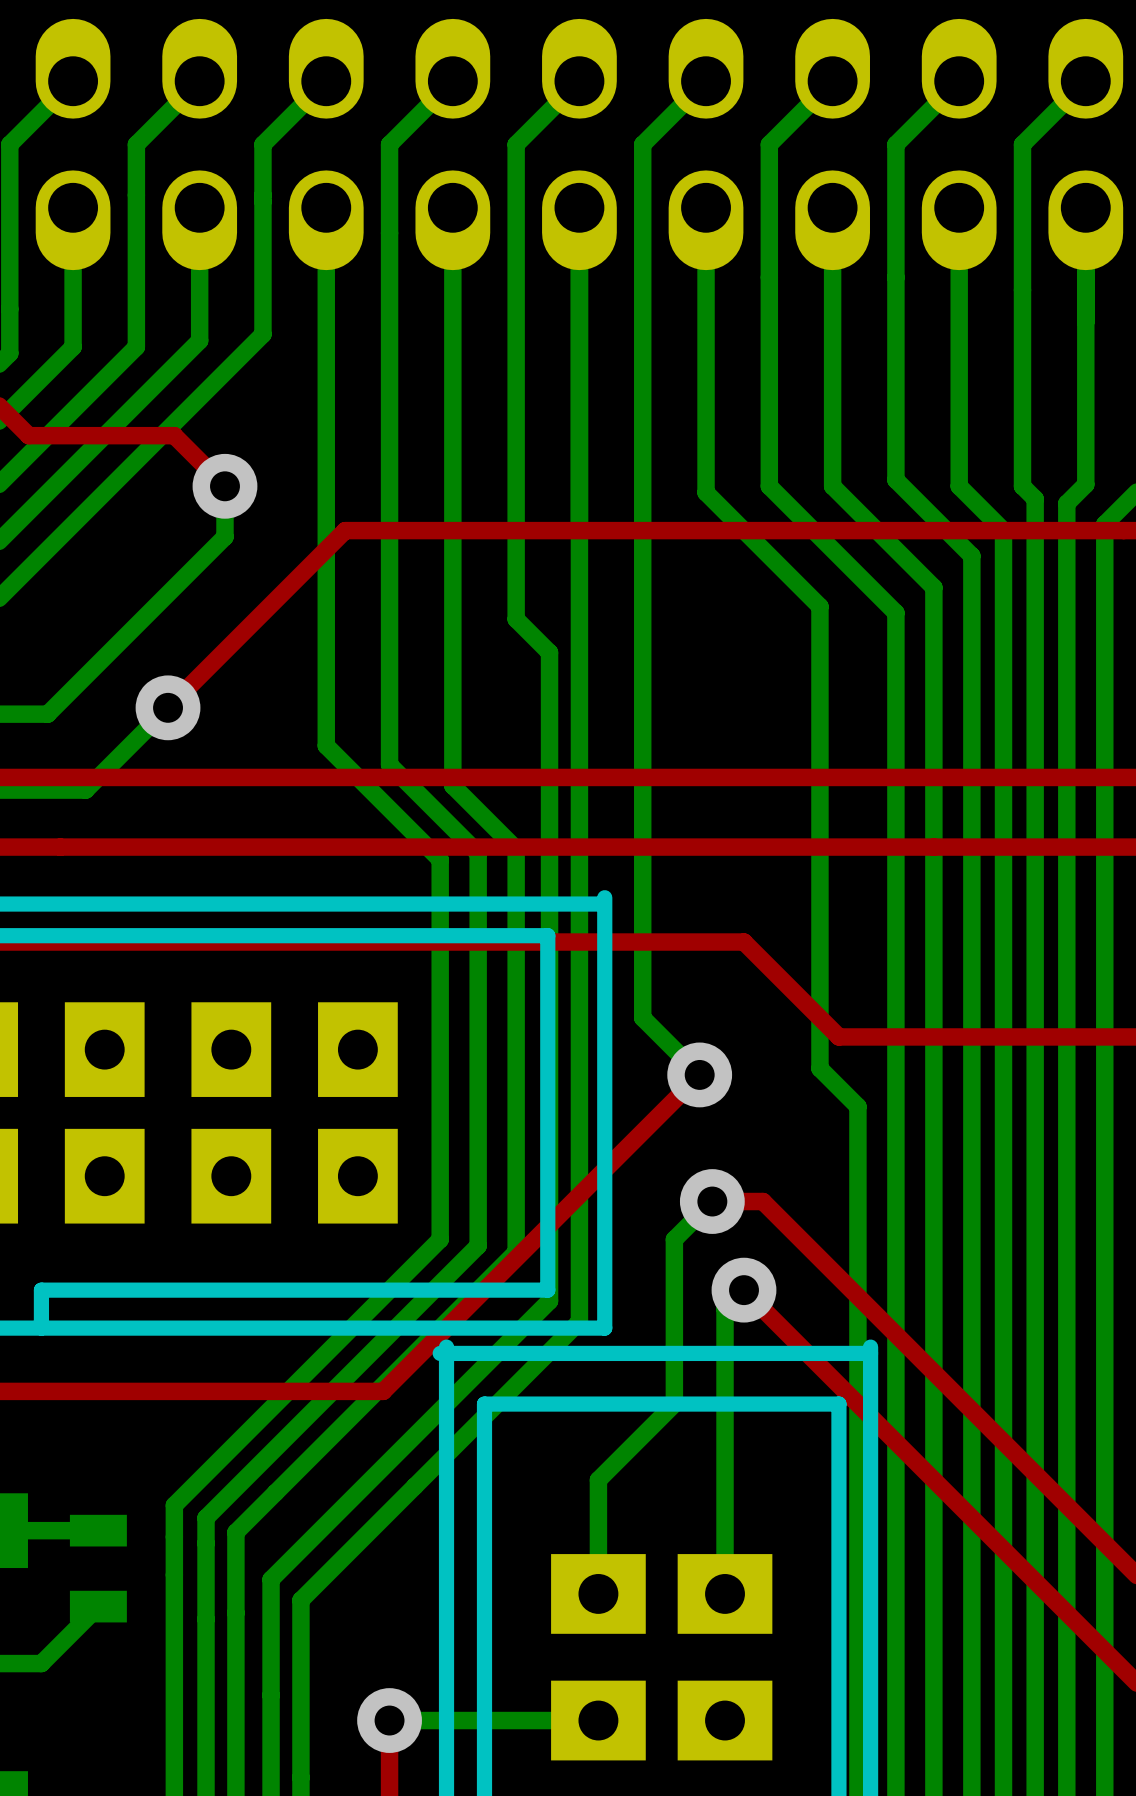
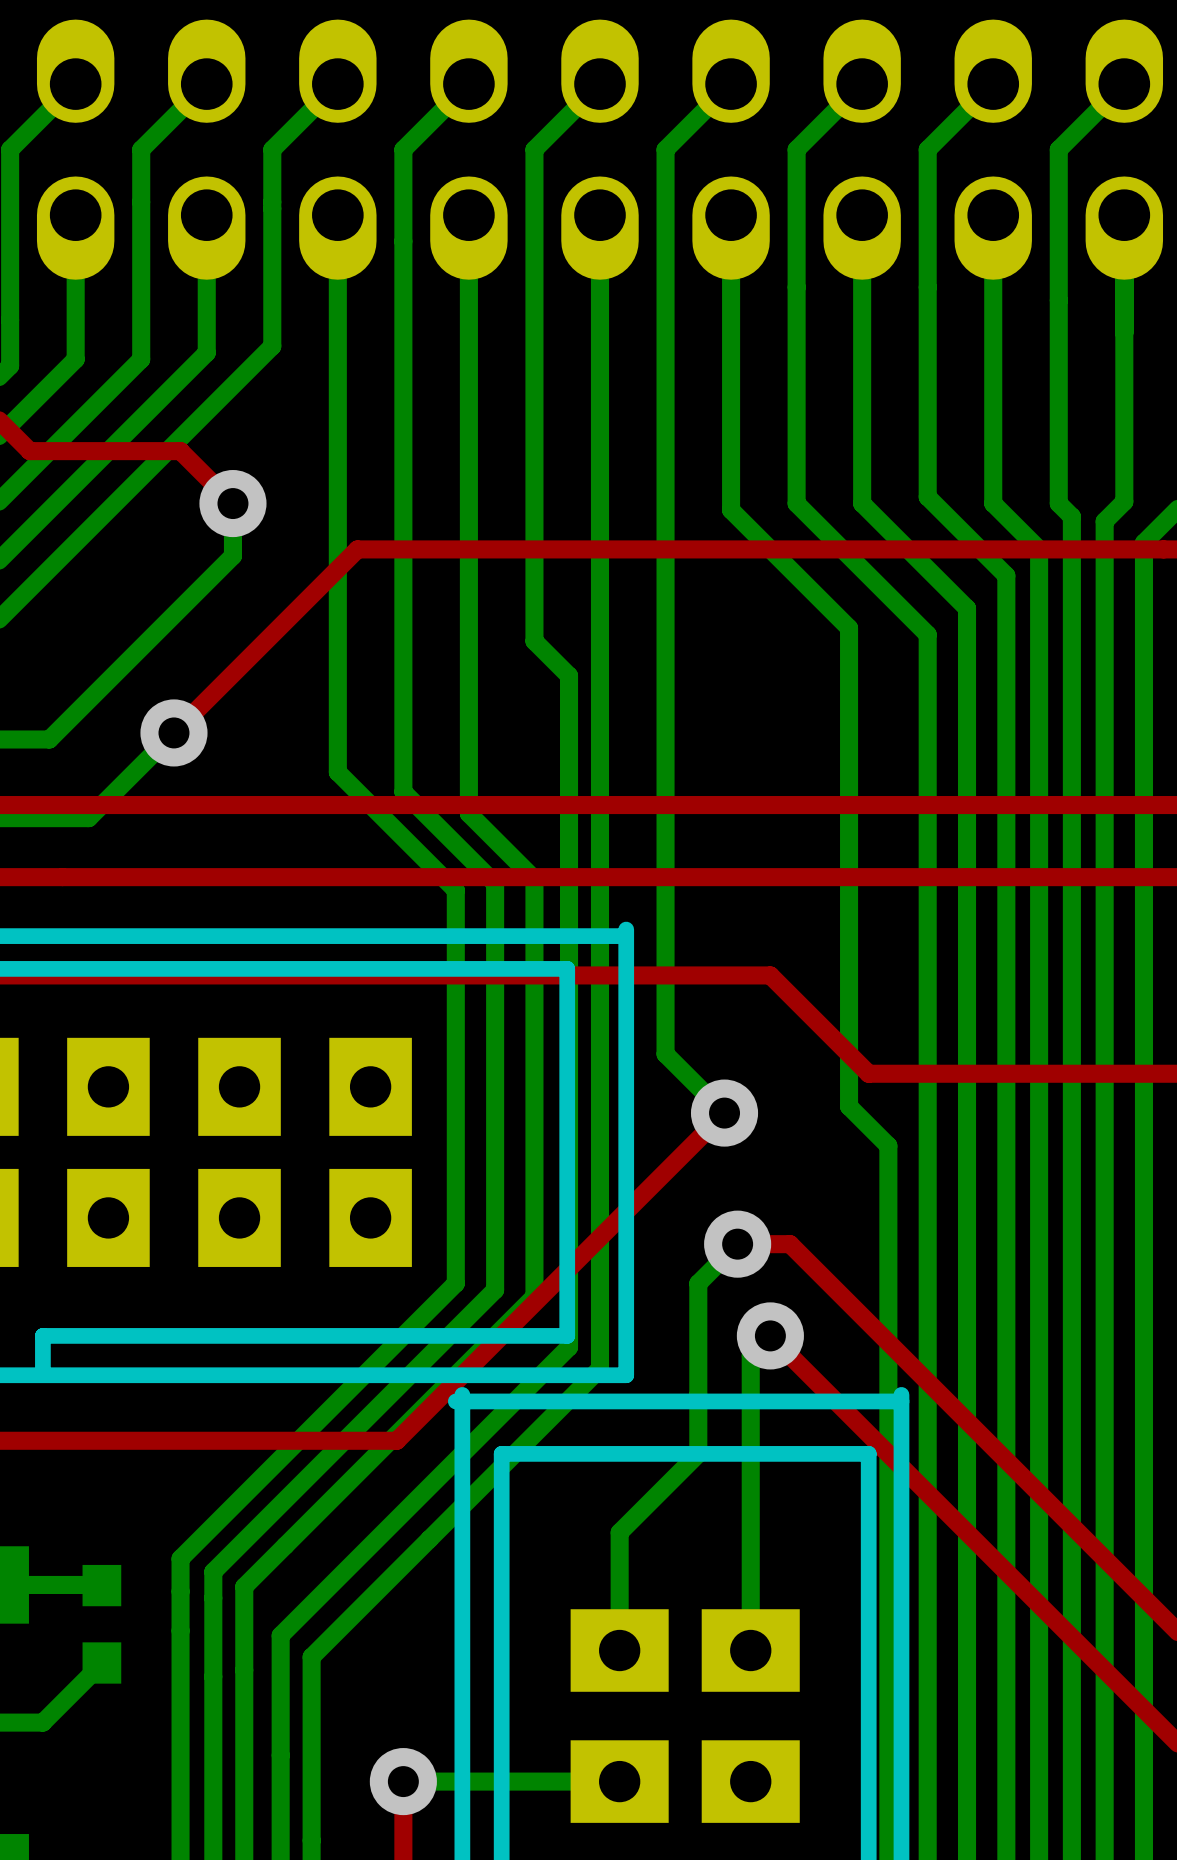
part footprint: [69, 1514, 127, 1623] -> [82, 1564, 122, 1684]

